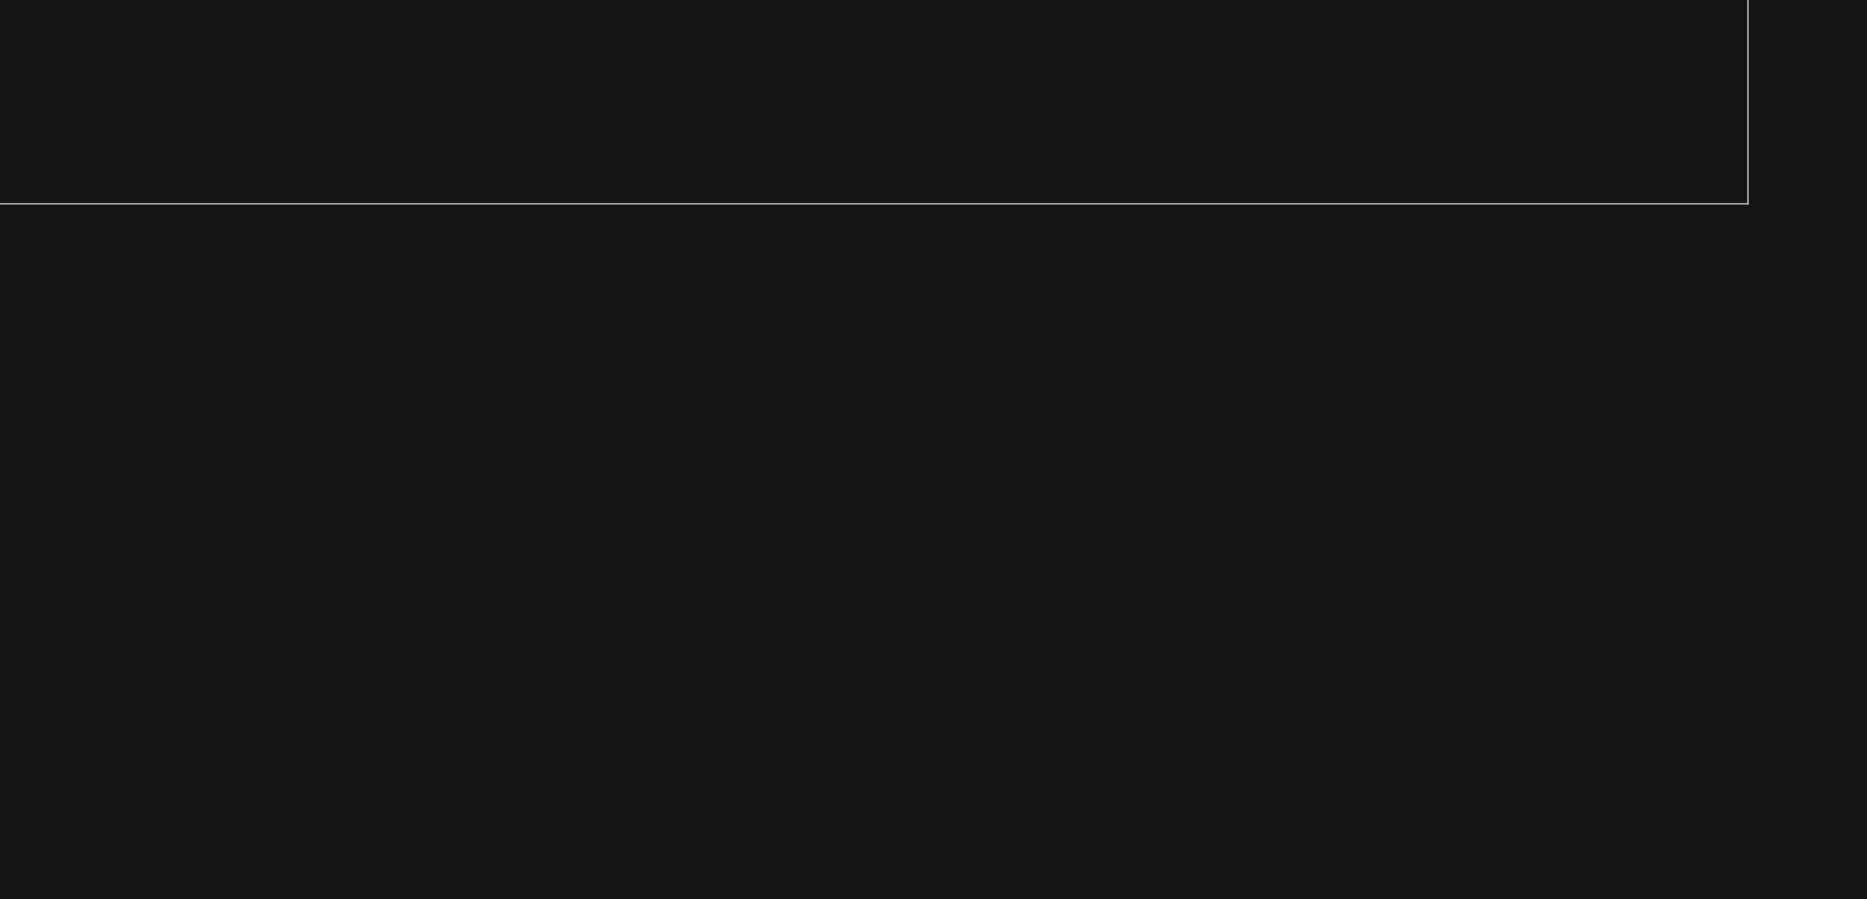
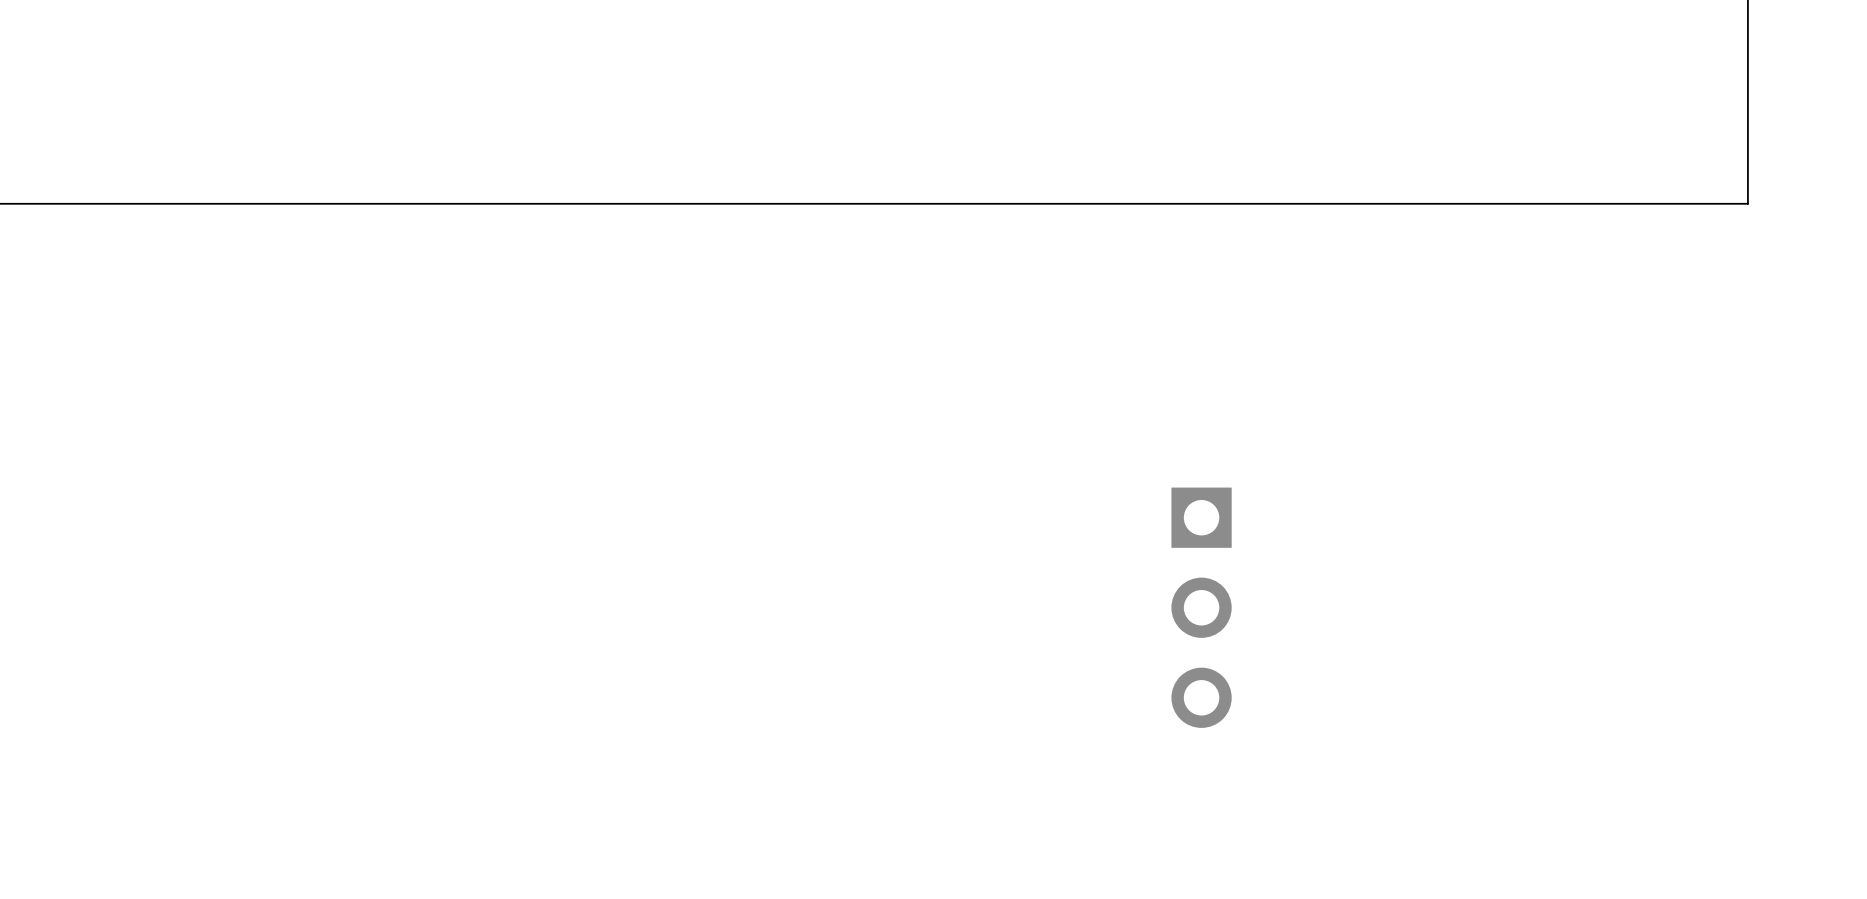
part: none -> (1201, 607)

